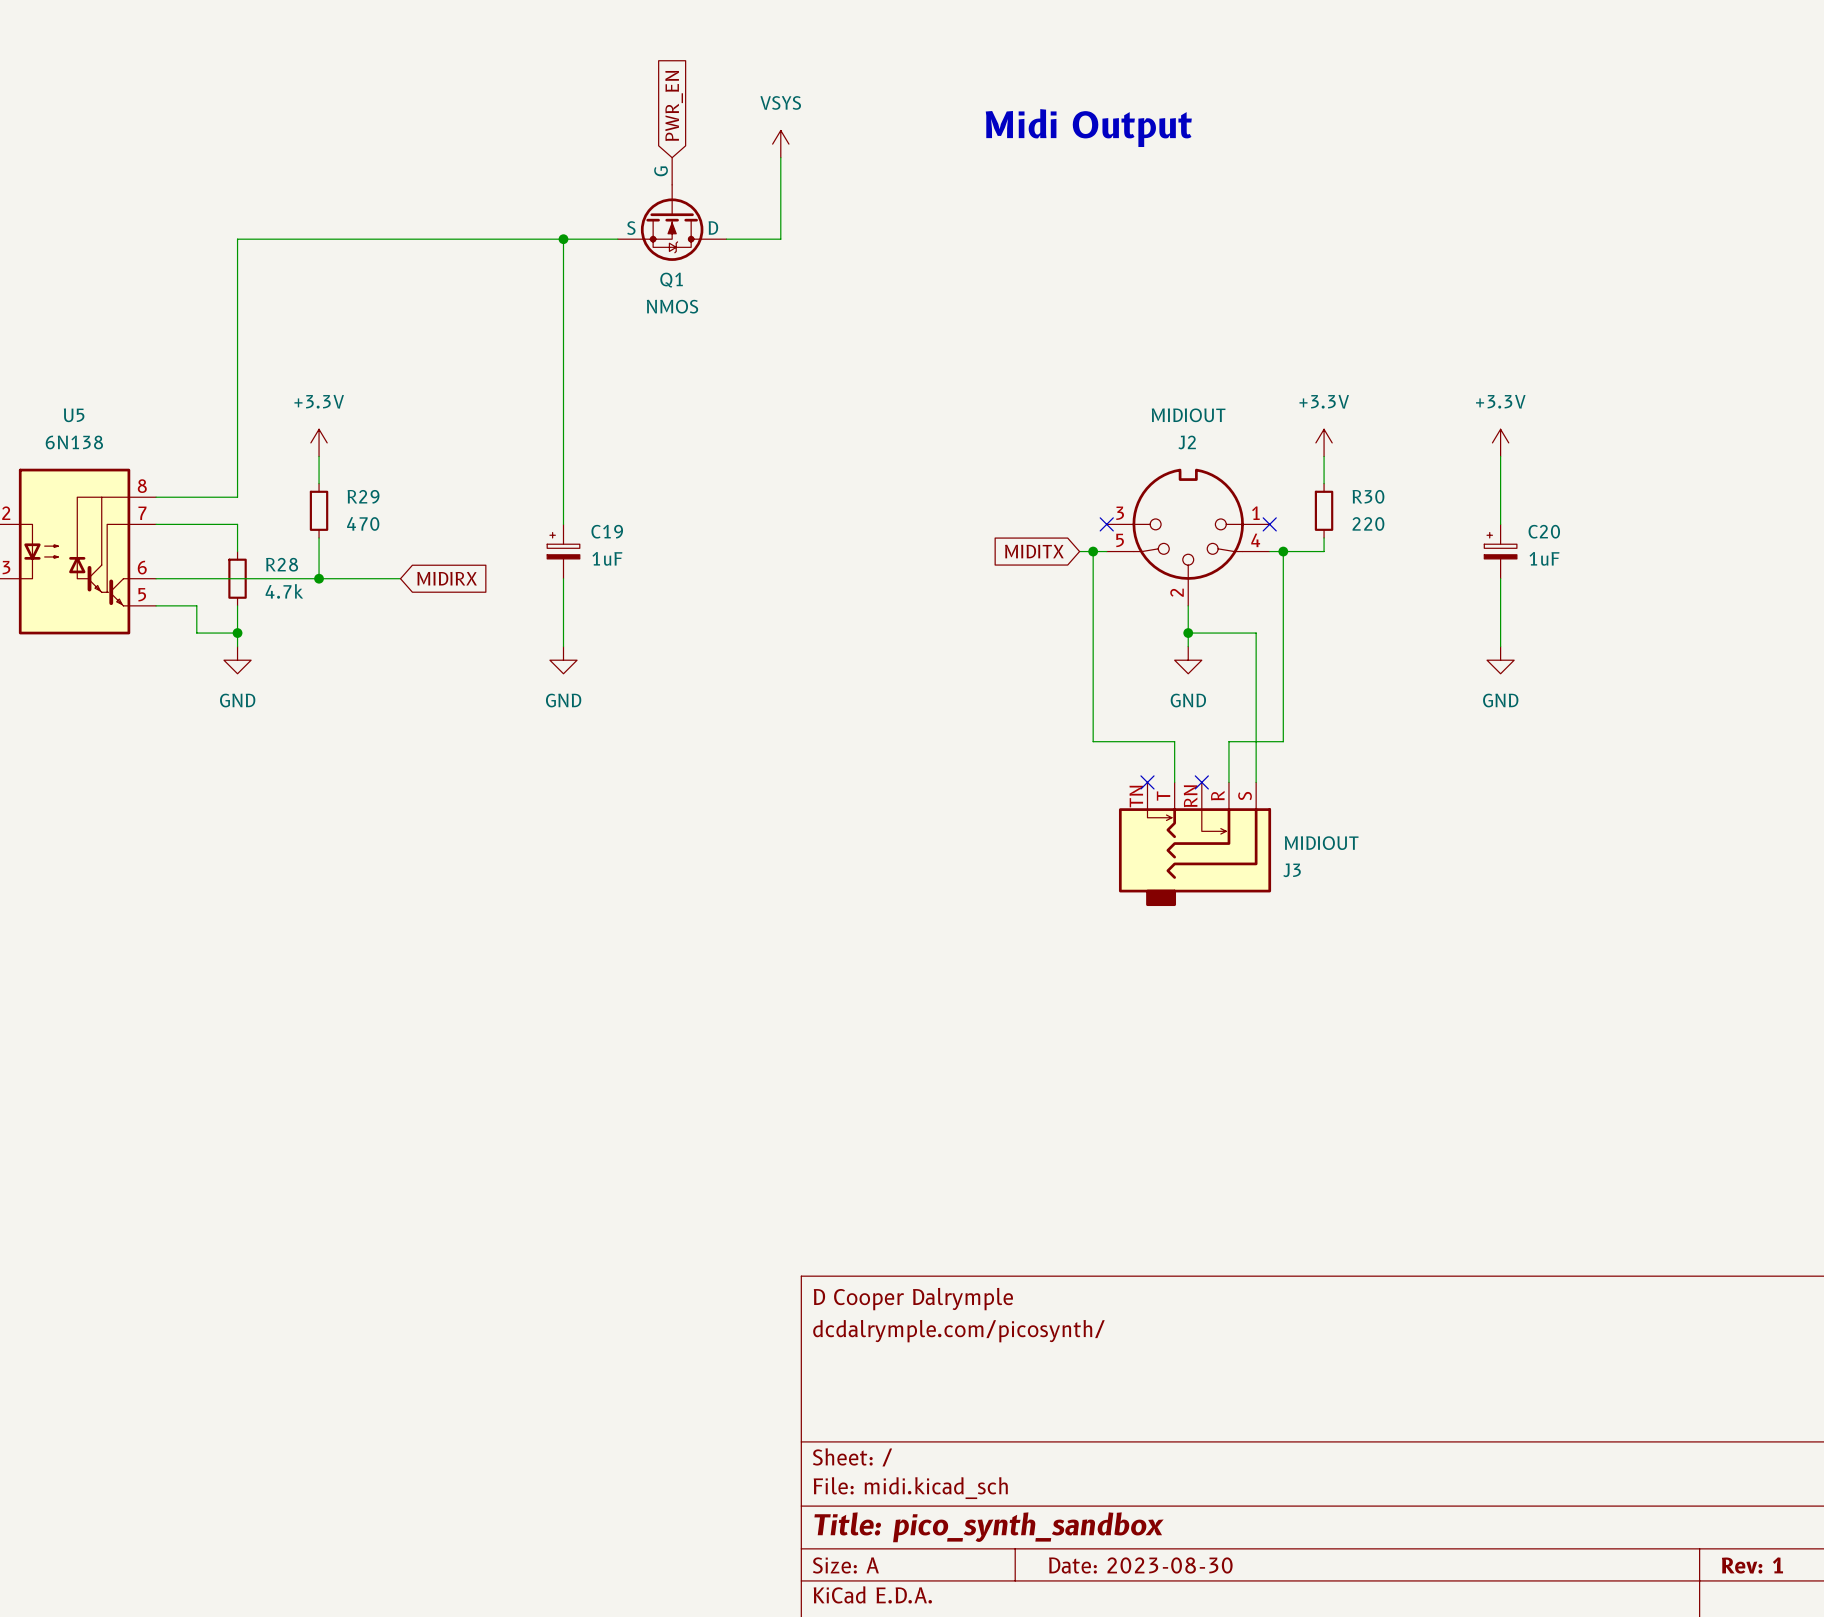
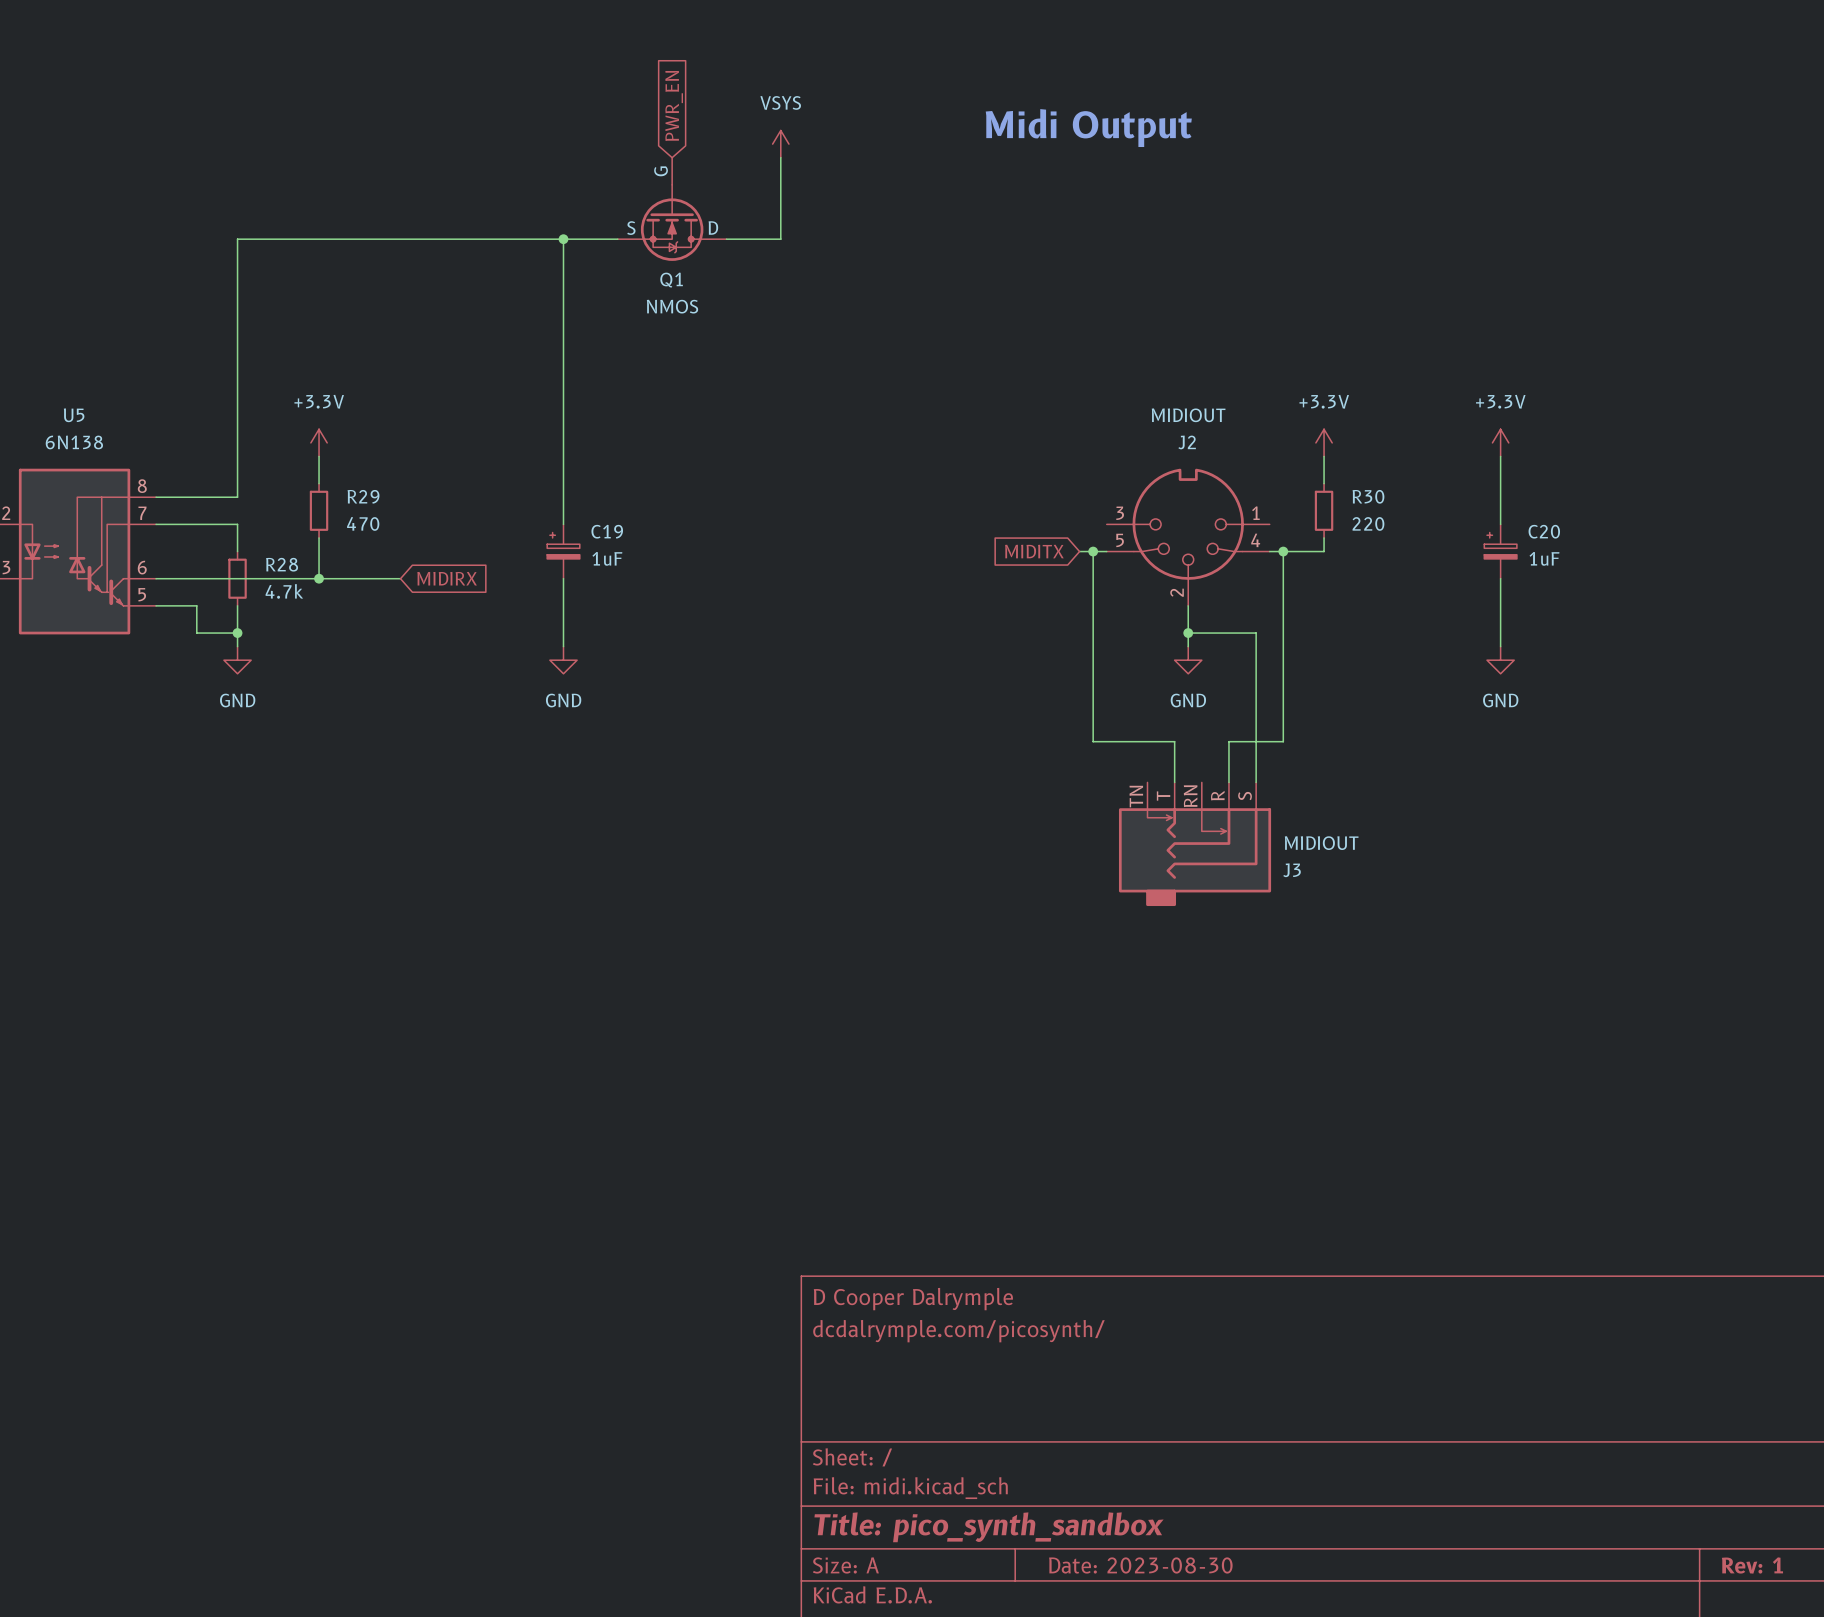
no-connect mark: (1106, 524) -> none
no-connect mark: (1269, 524) -> none
no-connect mark: (1147, 782) -> none
no-connect mark: (1201, 782) -> none

